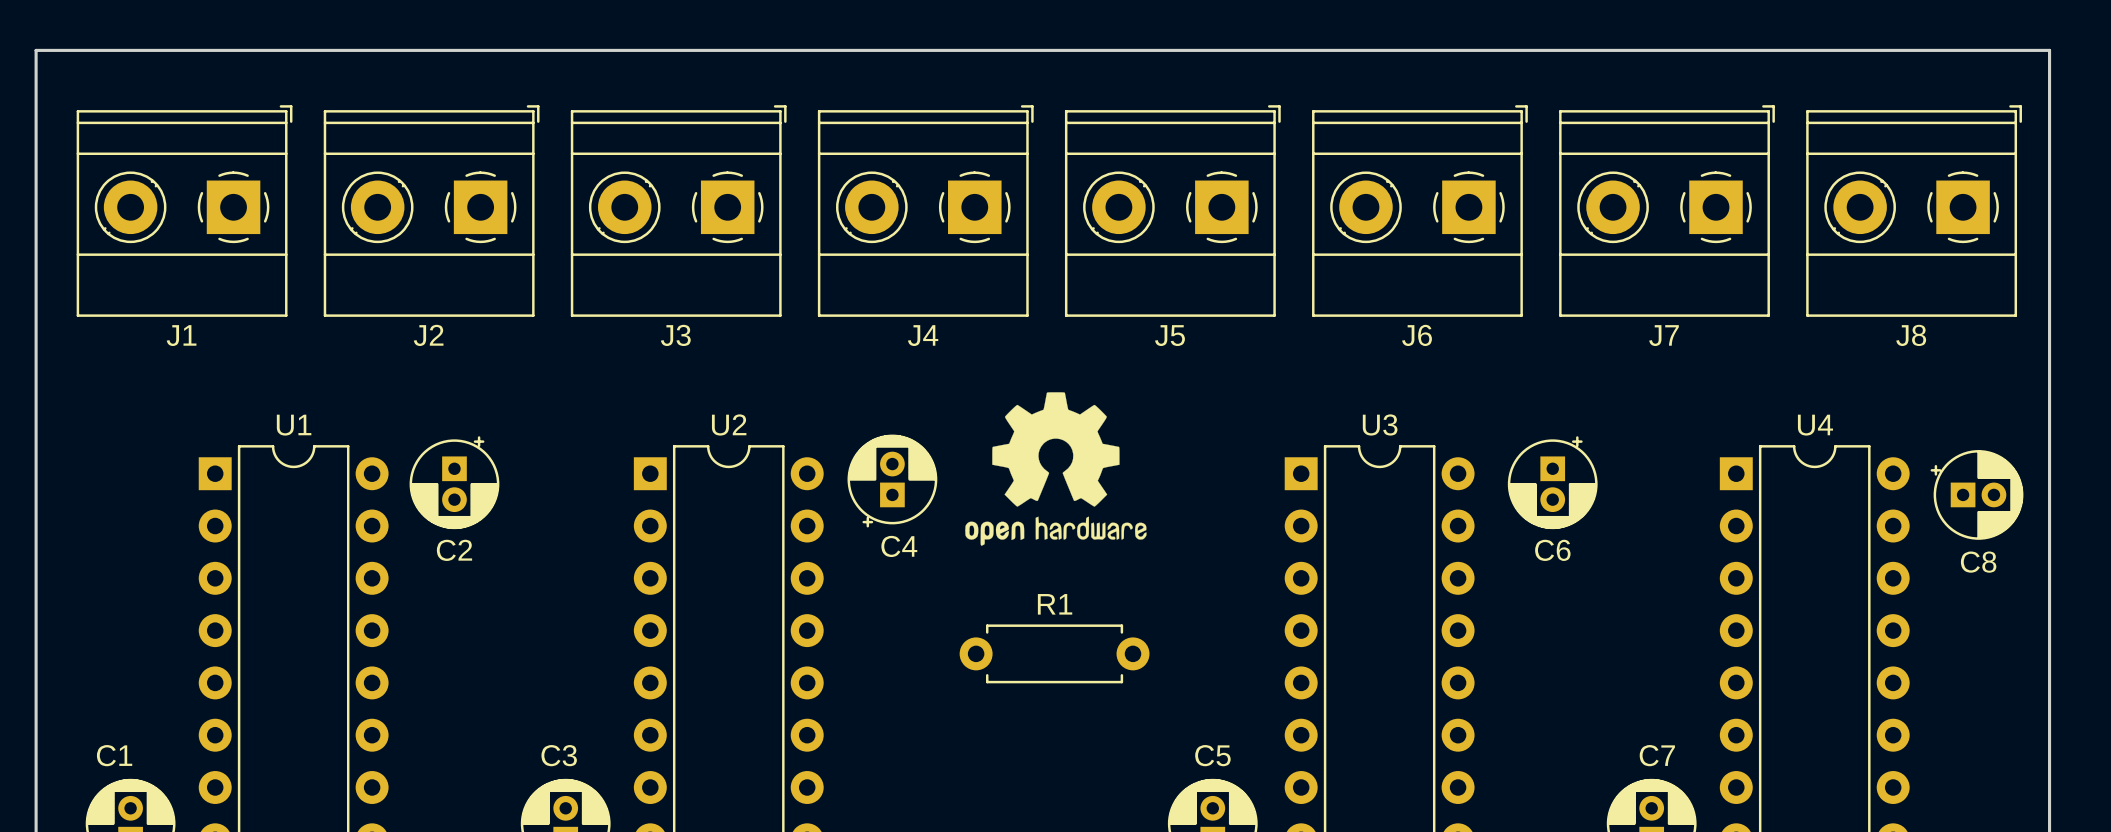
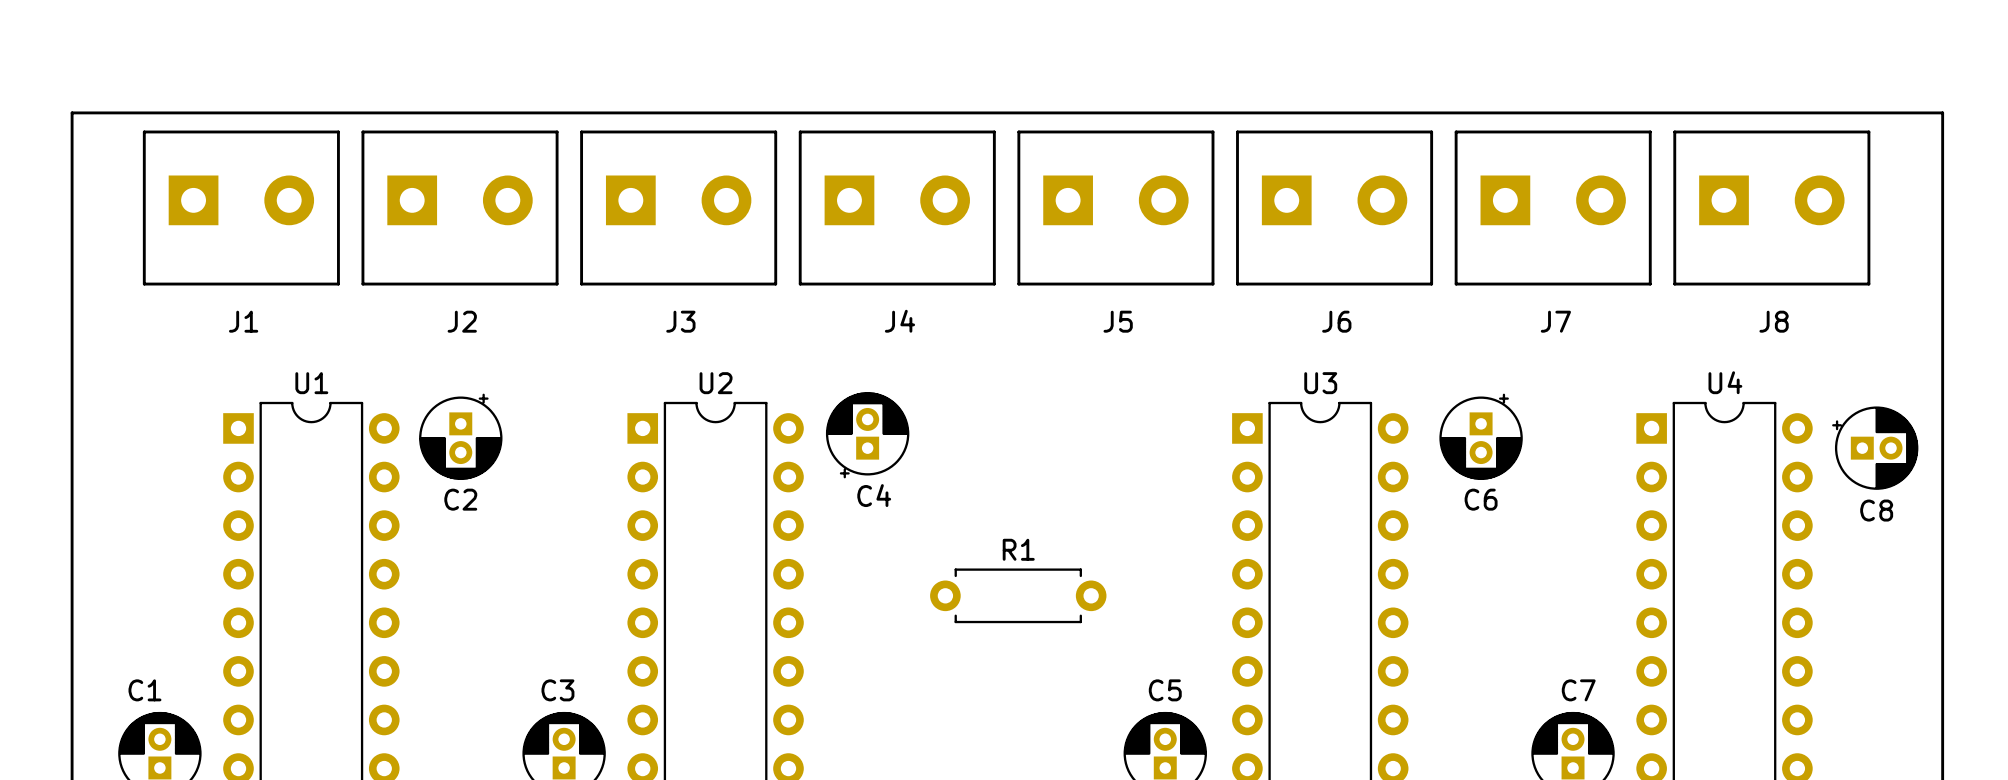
J1 footprint: [76, 105, 293, 317] -> [142, 130, 340, 286]
J2 footprint: [323, 105, 540, 317] -> [361, 130, 559, 286]
J3 footprint: [570, 105, 787, 317] -> [580, 130, 778, 286]
J4 footprint: [817, 105, 1034, 317] -> [798, 130, 996, 286]
J5 footprint: [1064, 105, 1281, 317] -> [1017, 130, 1215, 286]
J6 footprint: [1312, 105, 1528, 317] -> [1236, 130, 1434, 286]
J7 footprint: [1559, 105, 1775, 317] -> [1454, 130, 1652, 286]
J8 footprint: [1806, 105, 2022, 317] -> [1673, 130, 1871, 286]
board edge: (36, 134) (36, 50) (2049, 50) (2049, 134) -> (72, 112) (1942, 112)
drawing: [965, 392, 1147, 546] -> none

